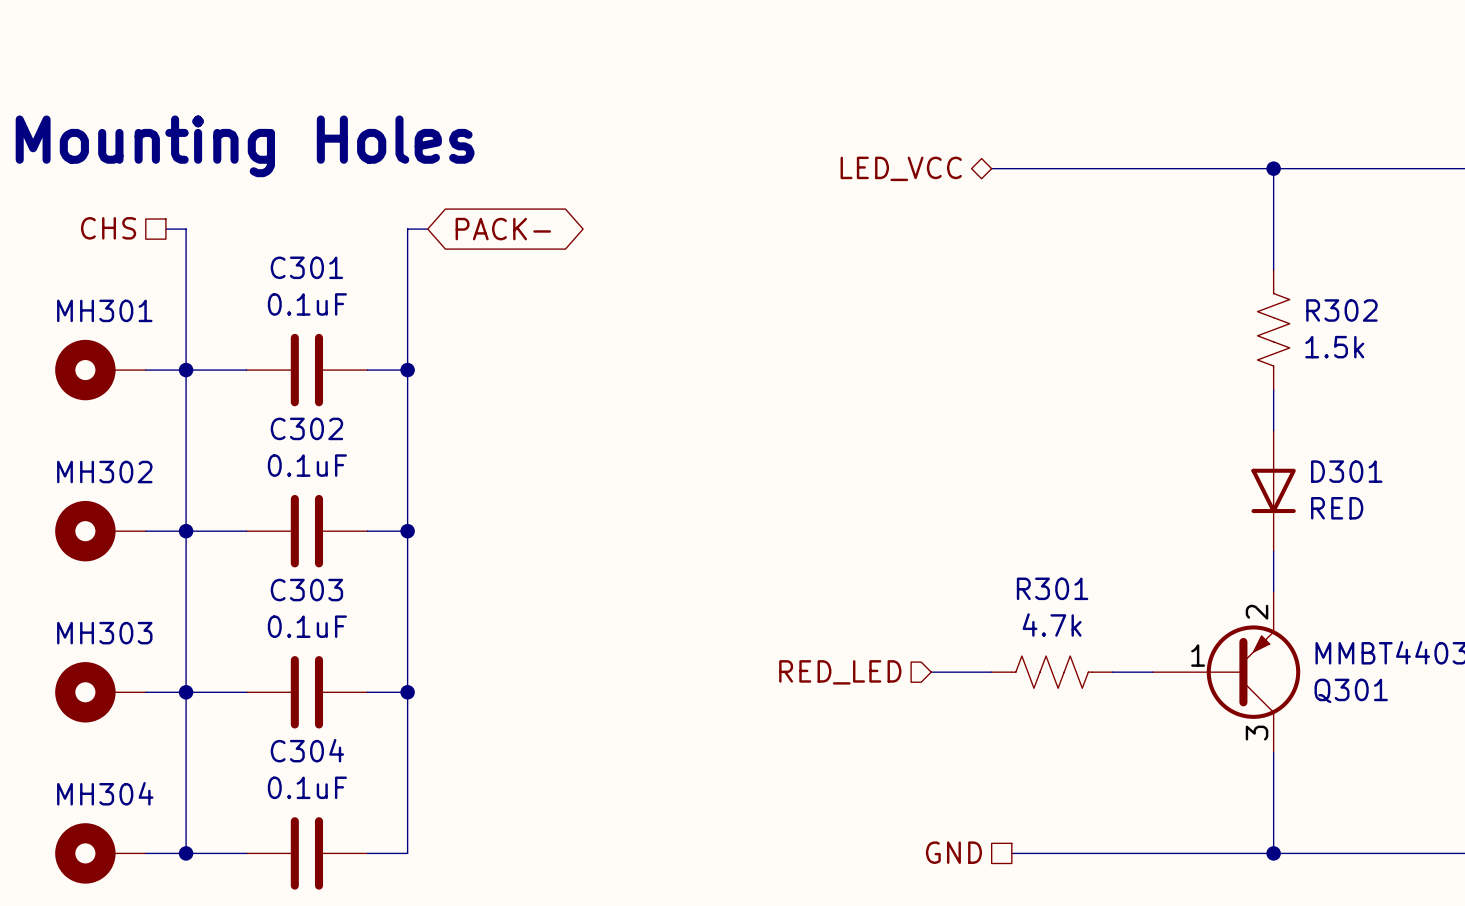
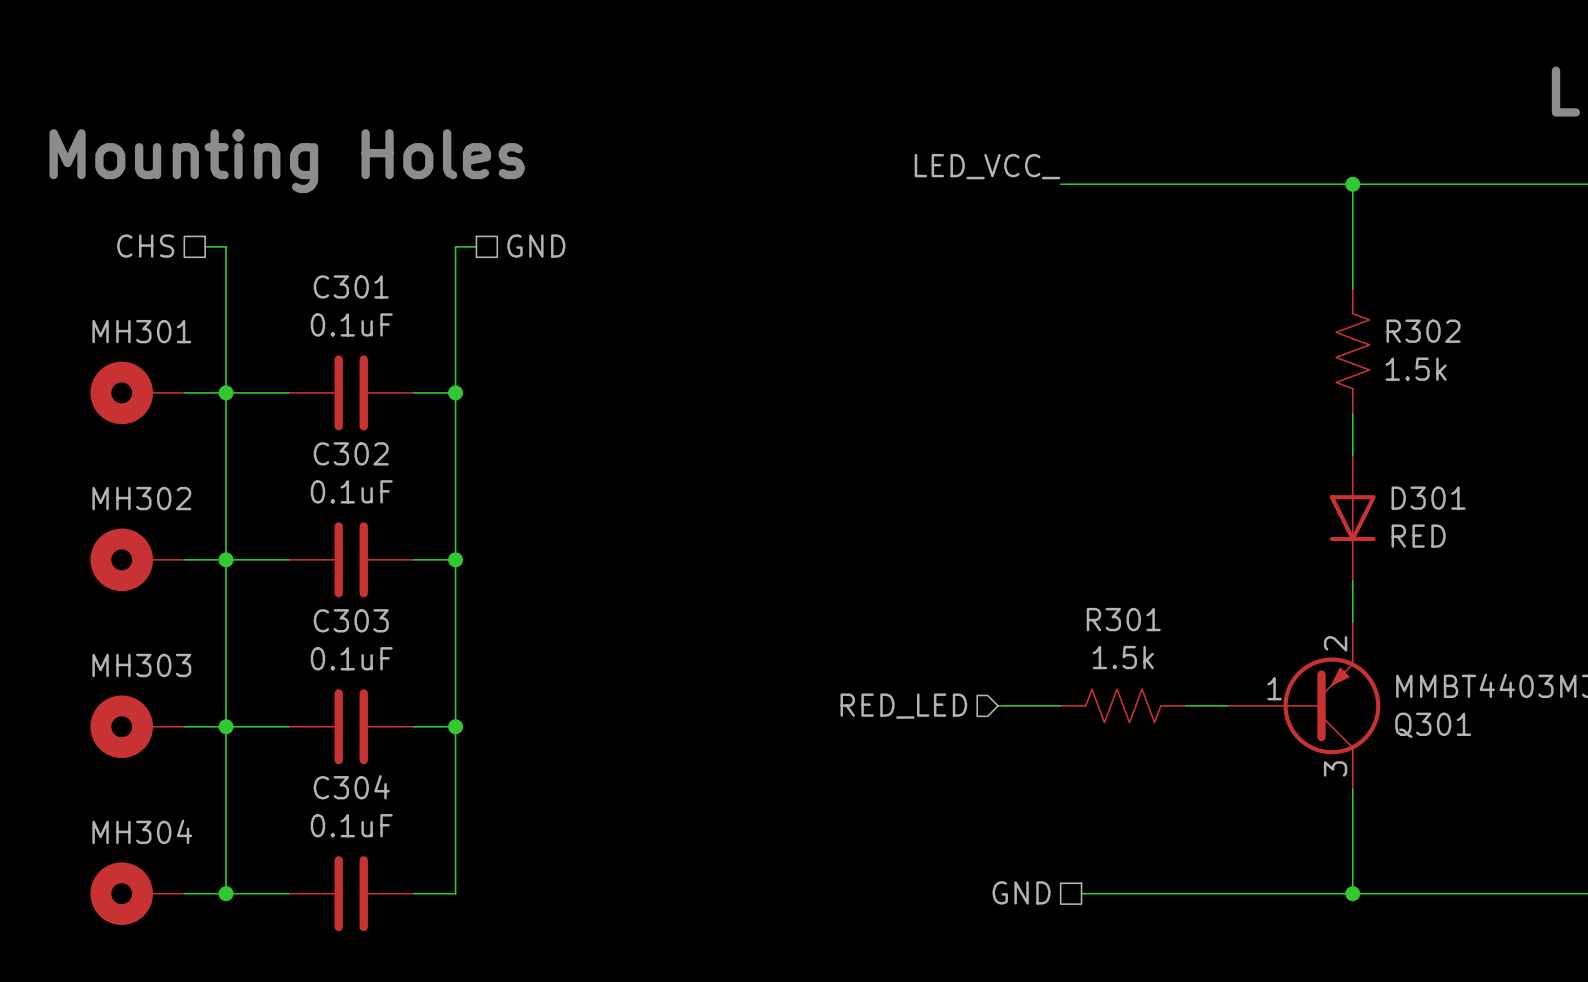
label: none -> LED_VCC_ (987, 166)
hierarchical label: LED_VCC (901, 168) -> none
hierarchical label: none -> GND (536, 246)
global label: PACK- (503, 229) -> none
R301 value: 4.7k (1052, 625) -> 1.5k (1123, 657)

